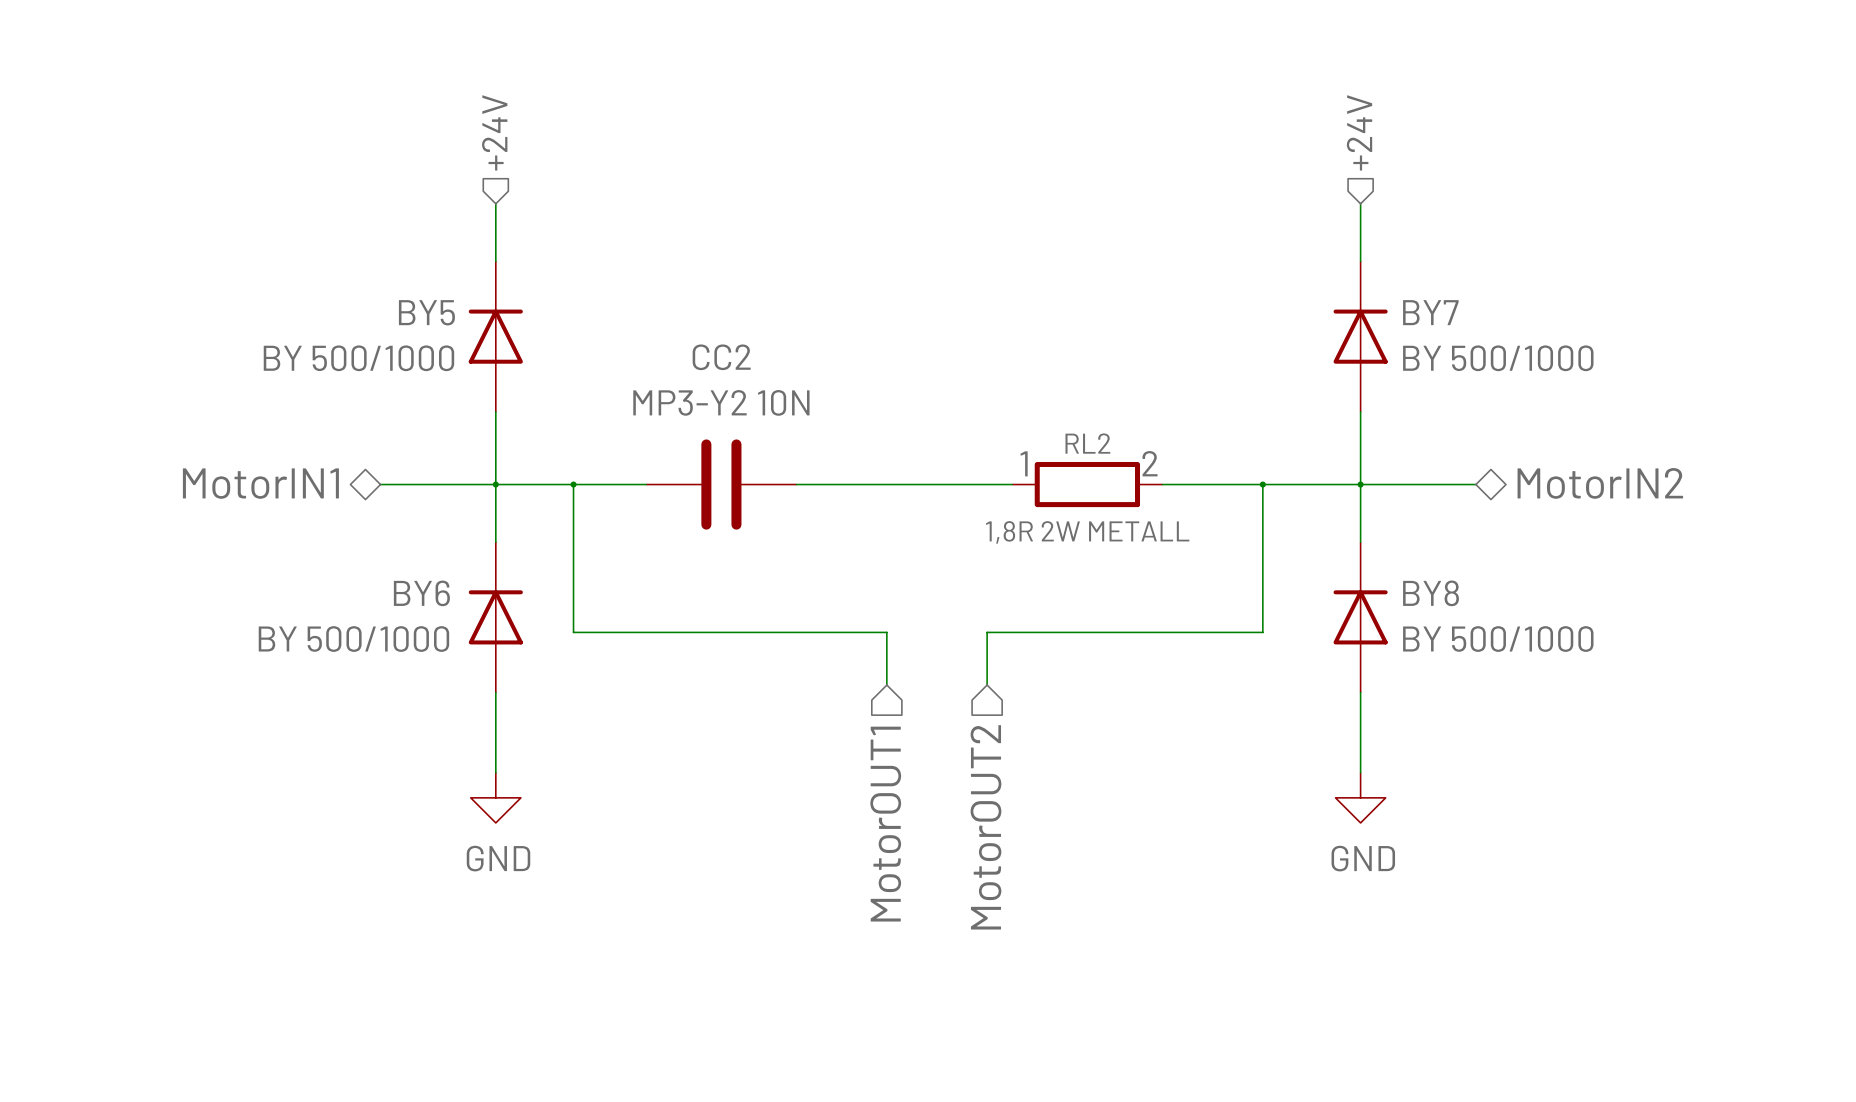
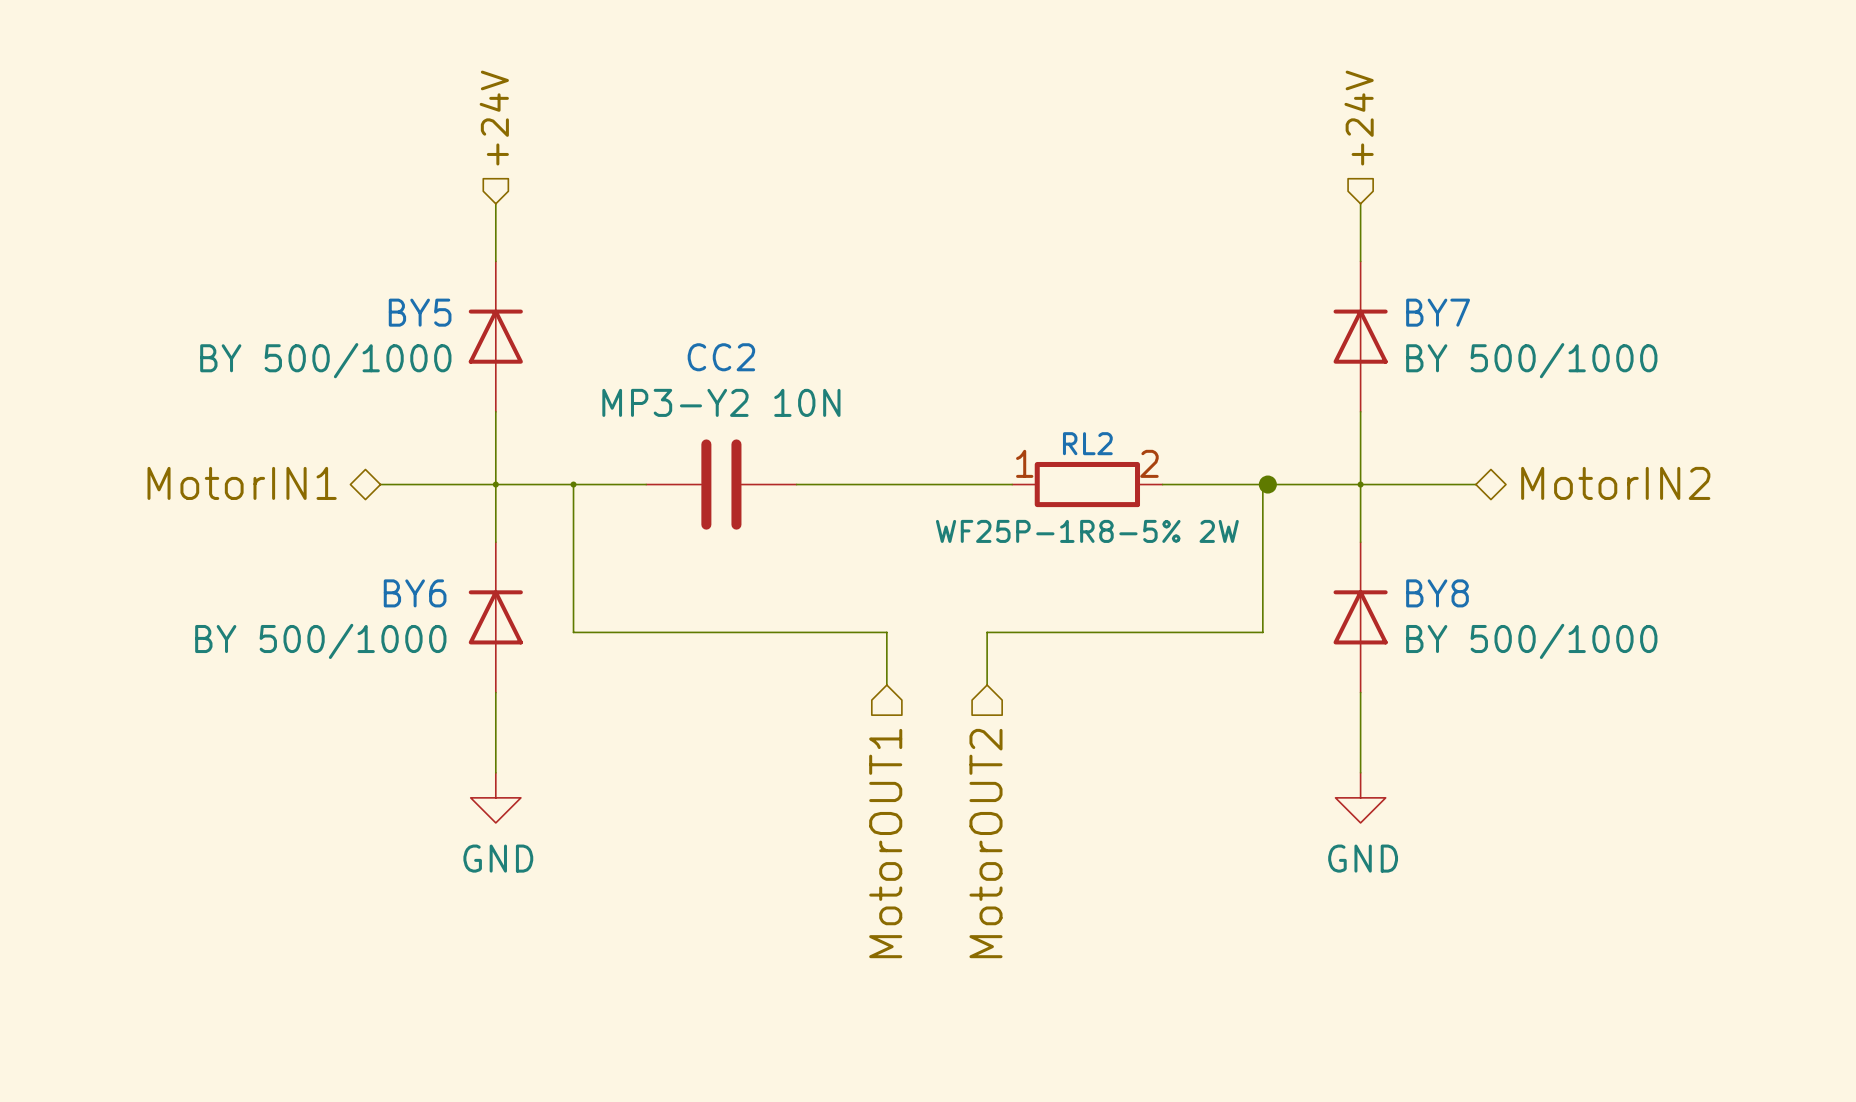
junction size: [1259, 481, 1266, 488] -> [1258, 475, 1277, 494]
RL2 value: 1,8R 2W METALL (1087, 532) -> WF25P-1R8-5% 2W (1087, 531)

